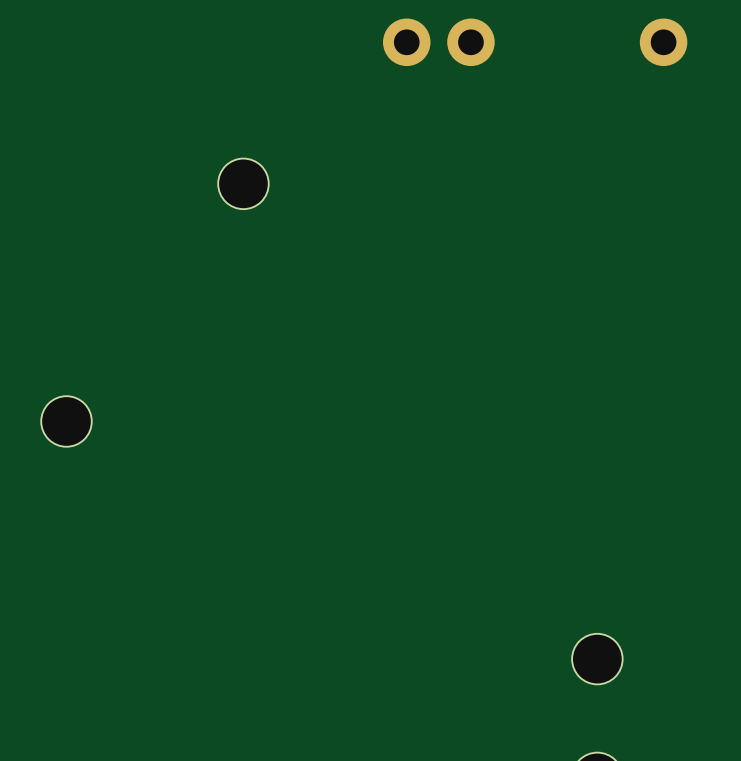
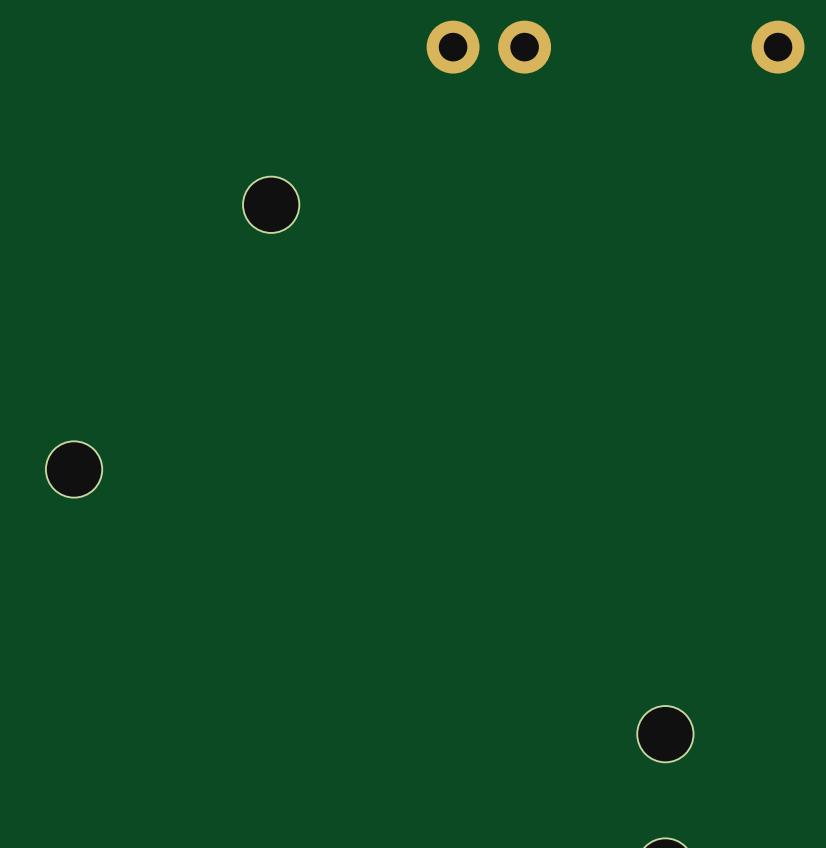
part position: (663, 42) -> (778, 47)

